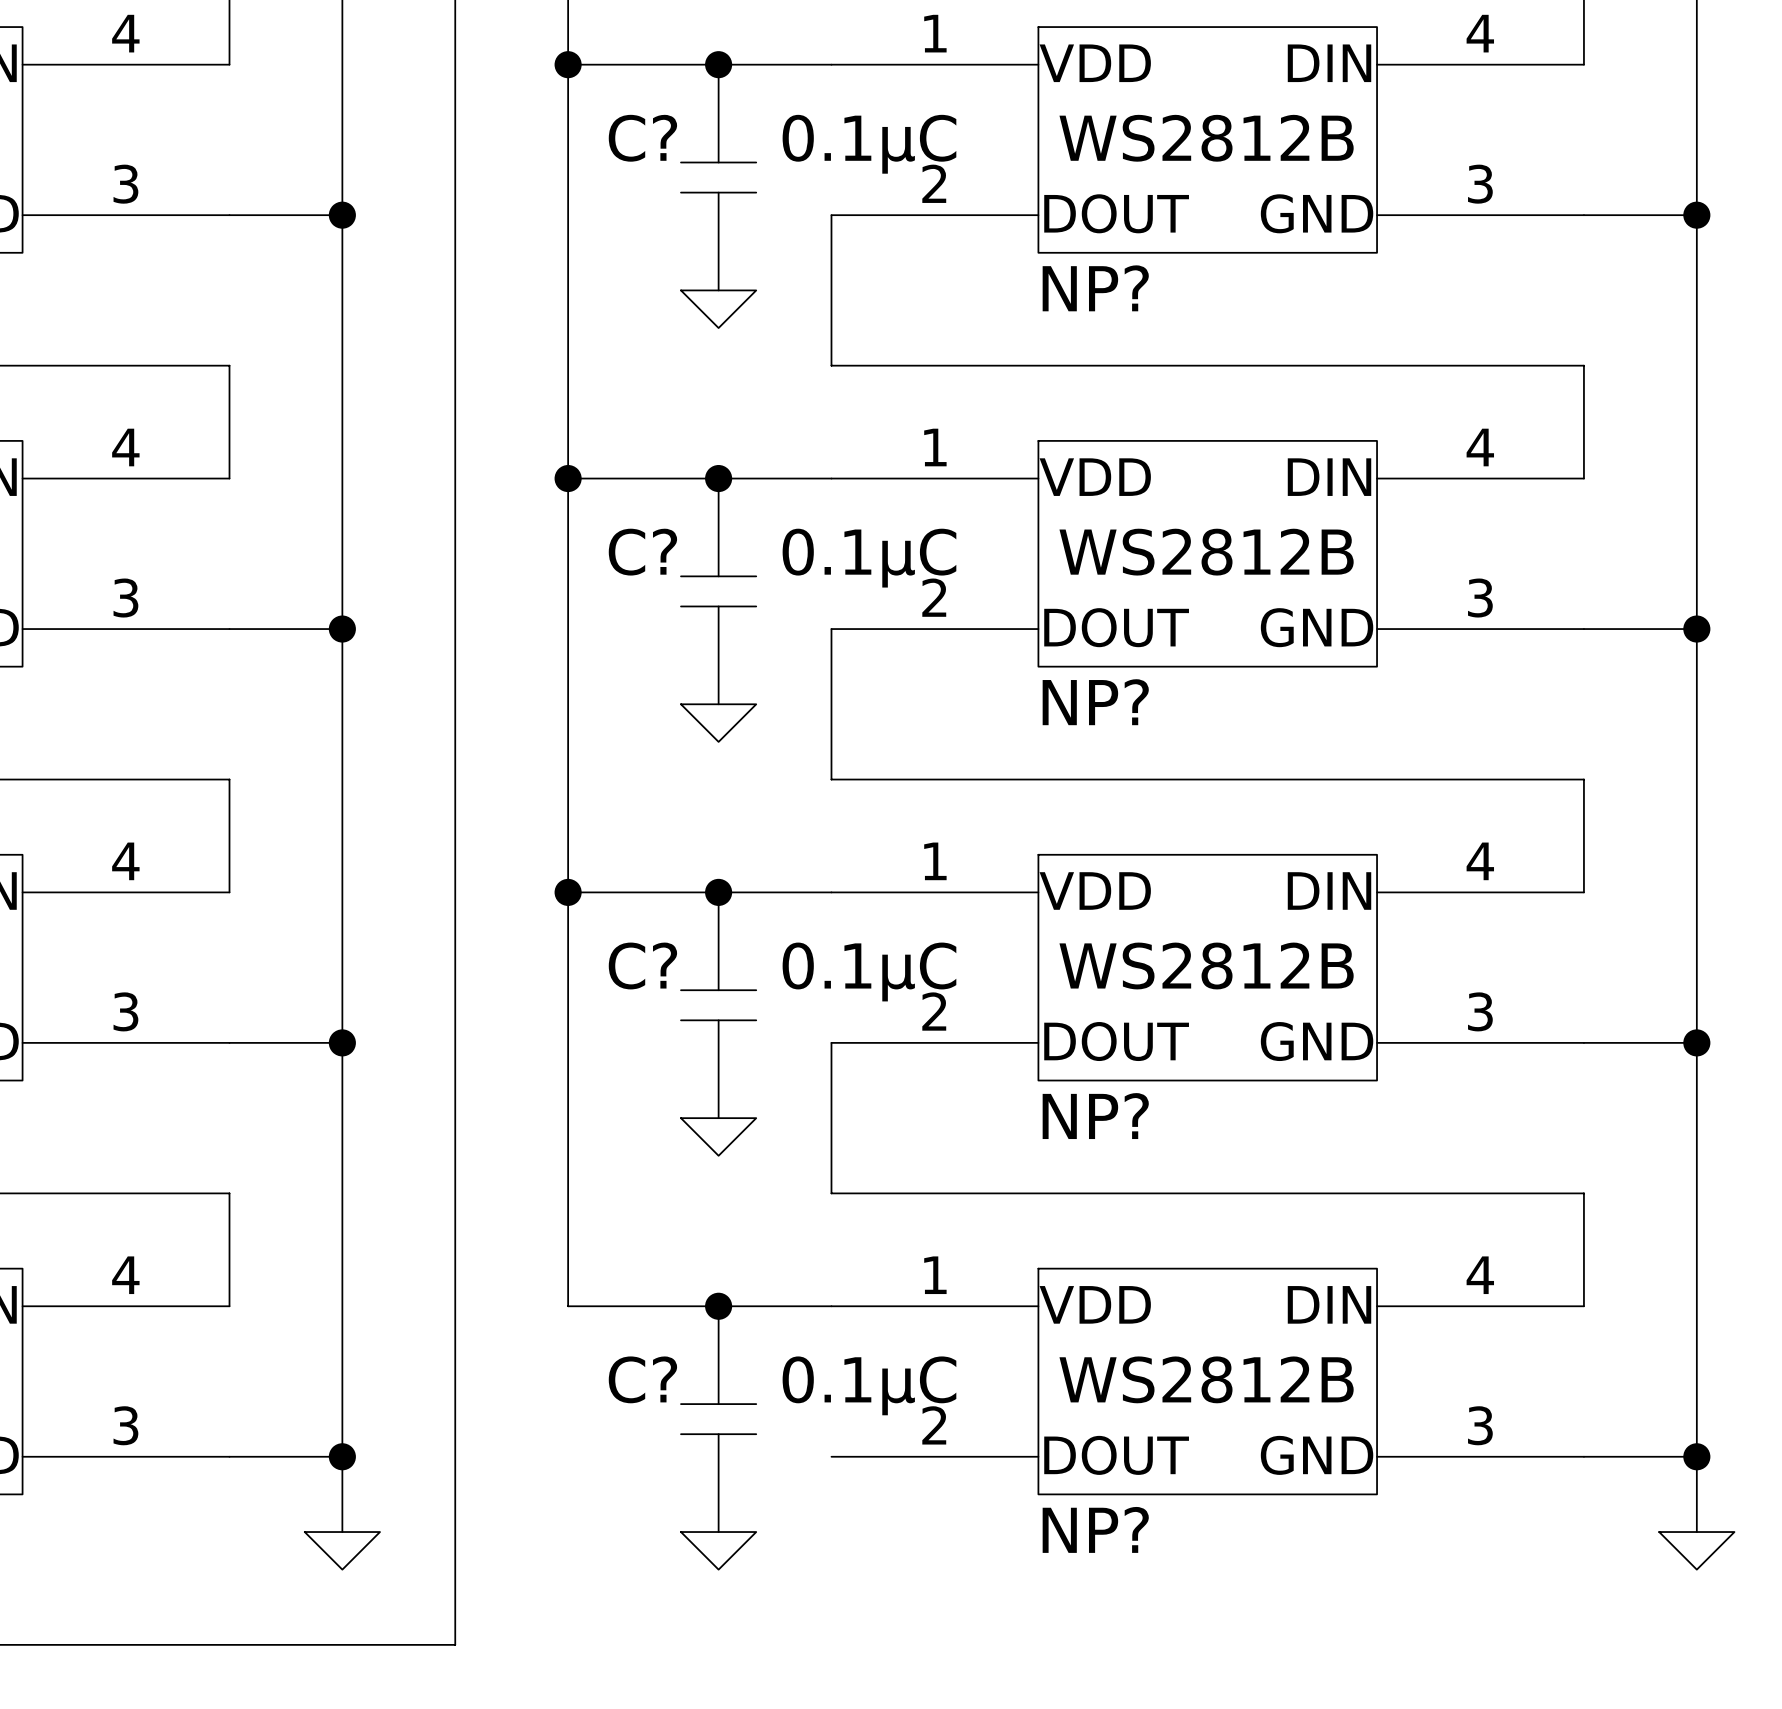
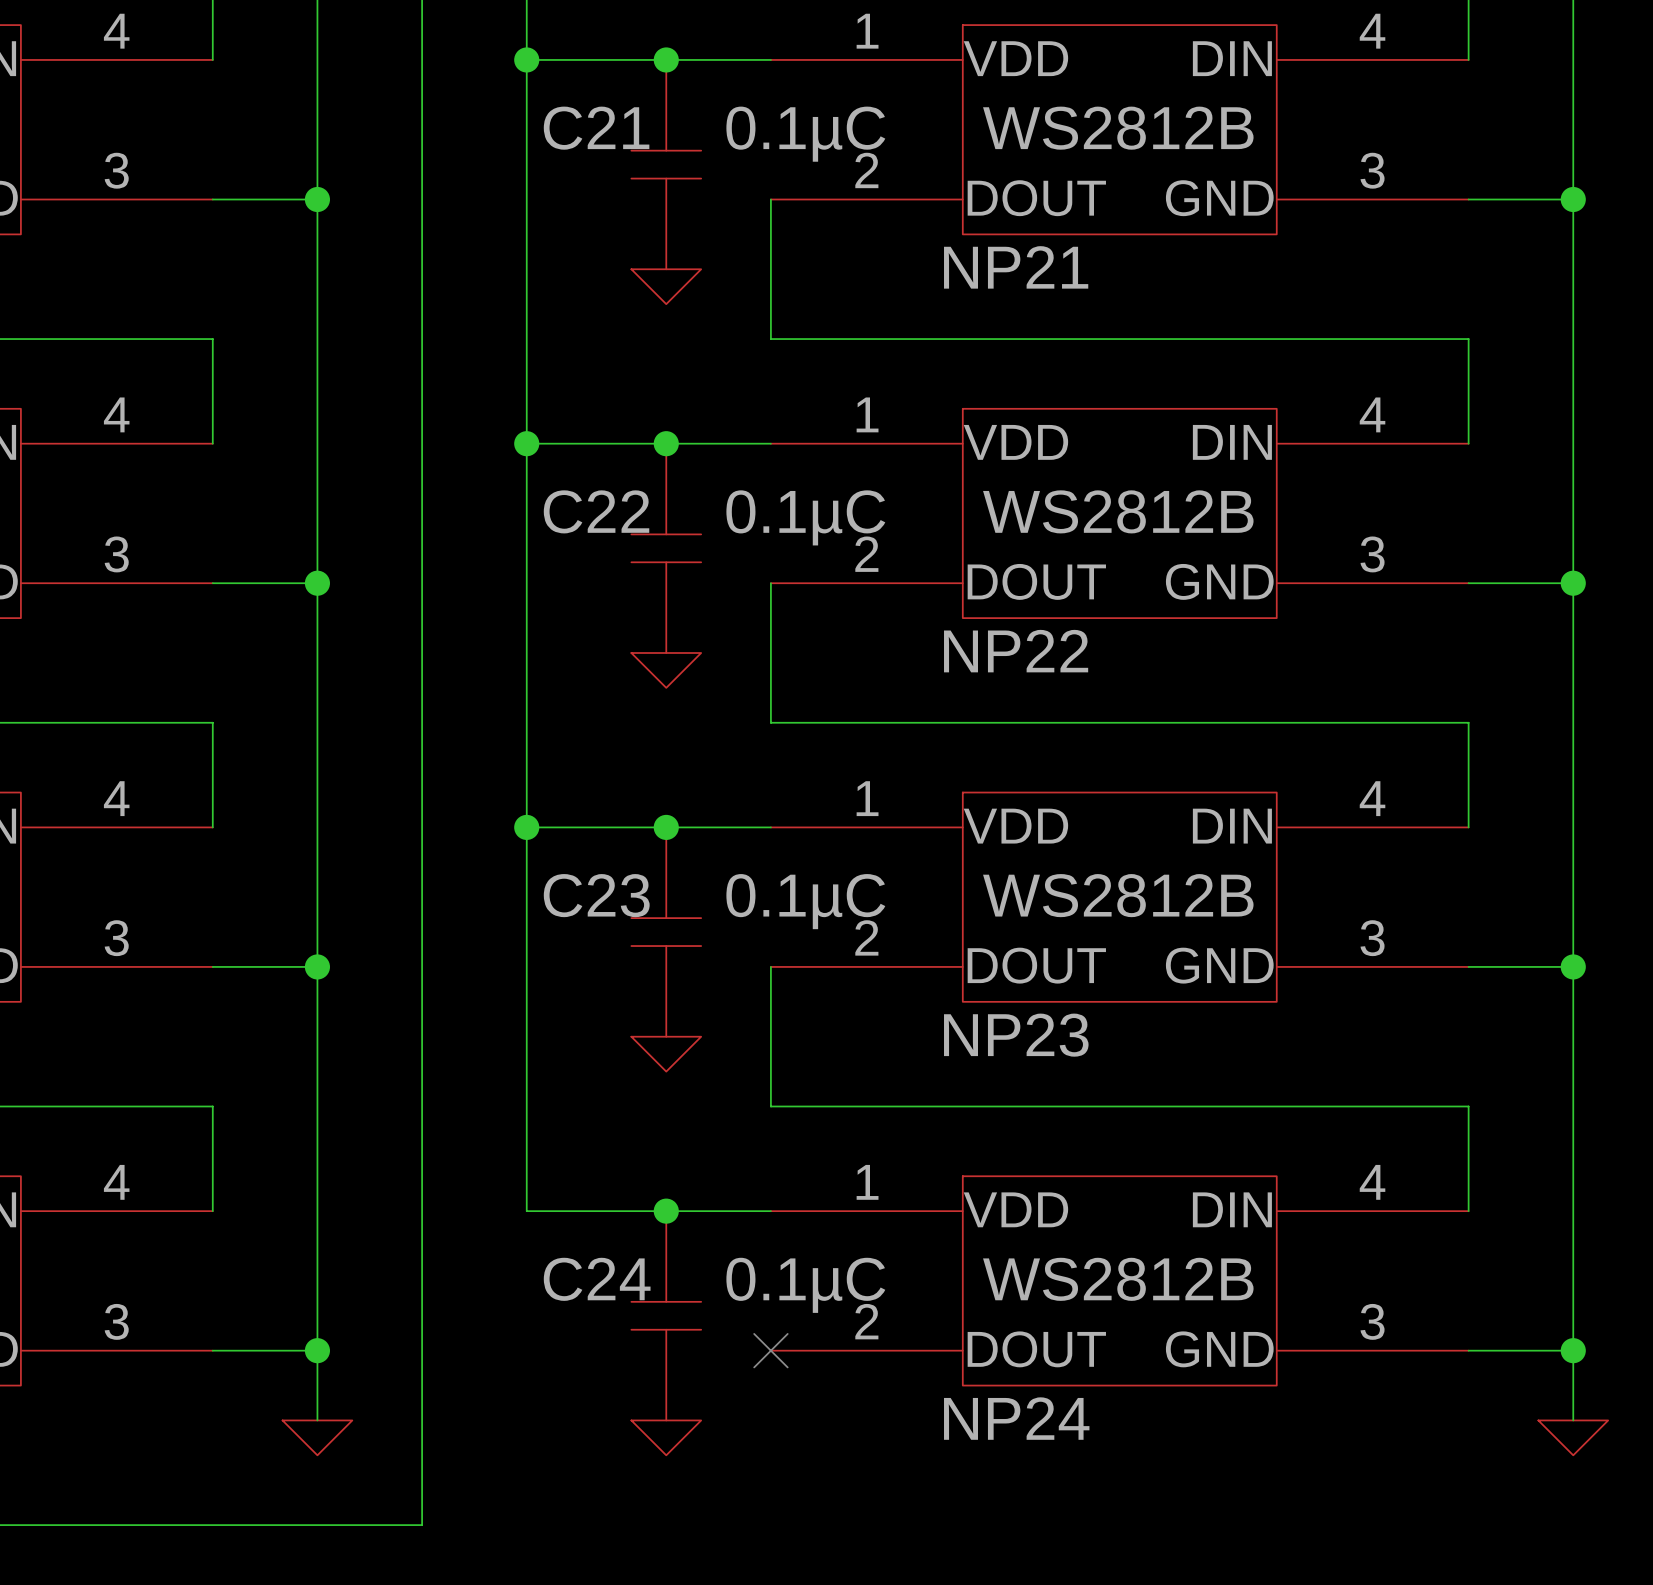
C? name: C? (642, 138) -> C21 (596, 128)
NP? name: NP? (1095, 288) -> NP21 (1016, 267)
C? name: C? (642, 552) -> C22 (596, 511)
NP? name: NP? (1095, 702) -> NP22 (1016, 651)
C? name: C? (642, 966) -> C23 (596, 895)
NP? name: NP? (1095, 1116) -> NP23 (1016, 1035)
C? name: C? (642, 1379) -> C24 (597, 1279)
no-connect mark: none -> (770, 1350)
NP? name: NP? (1095, 1529) -> NP24 (1016, 1418)

